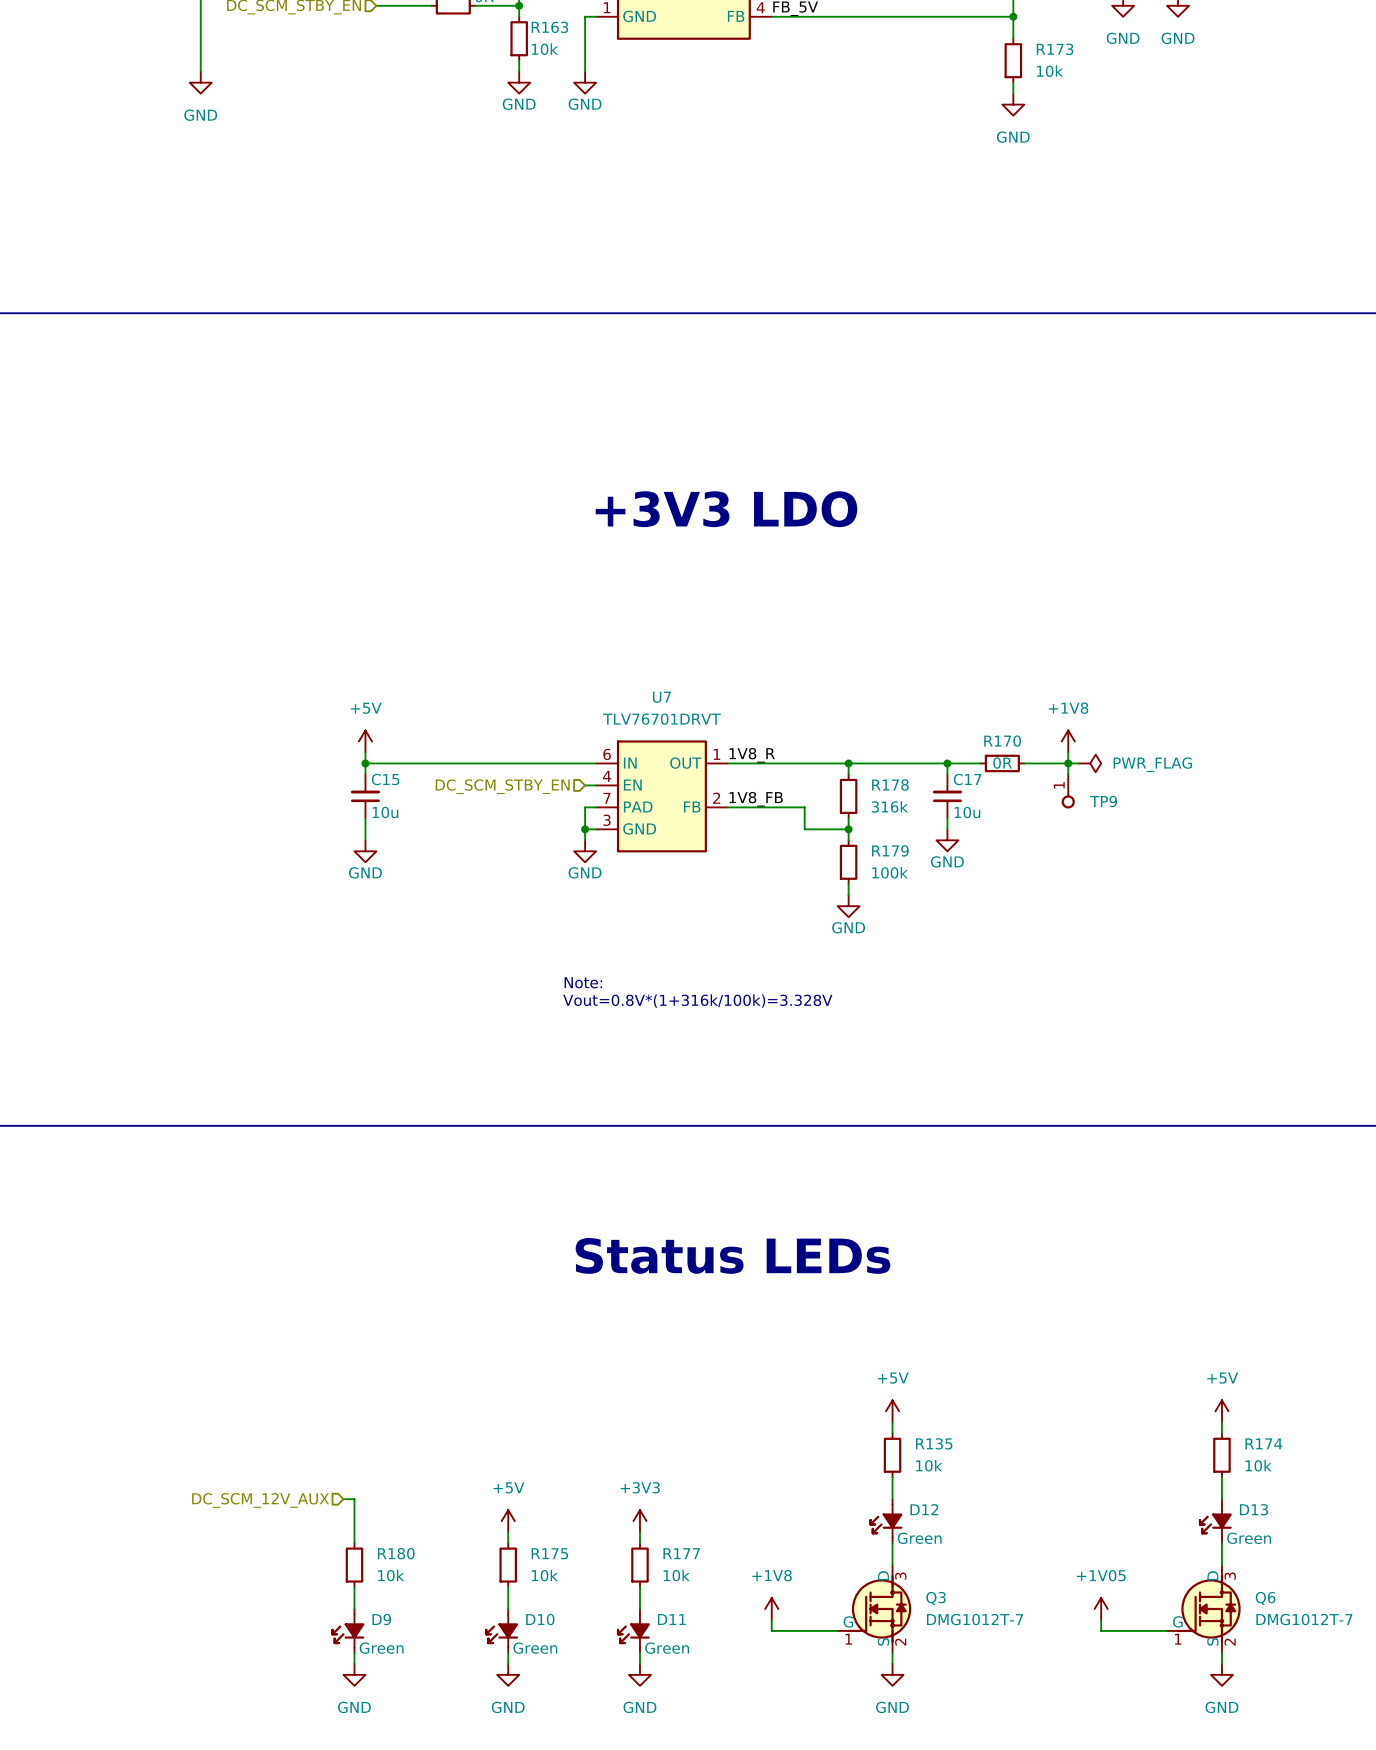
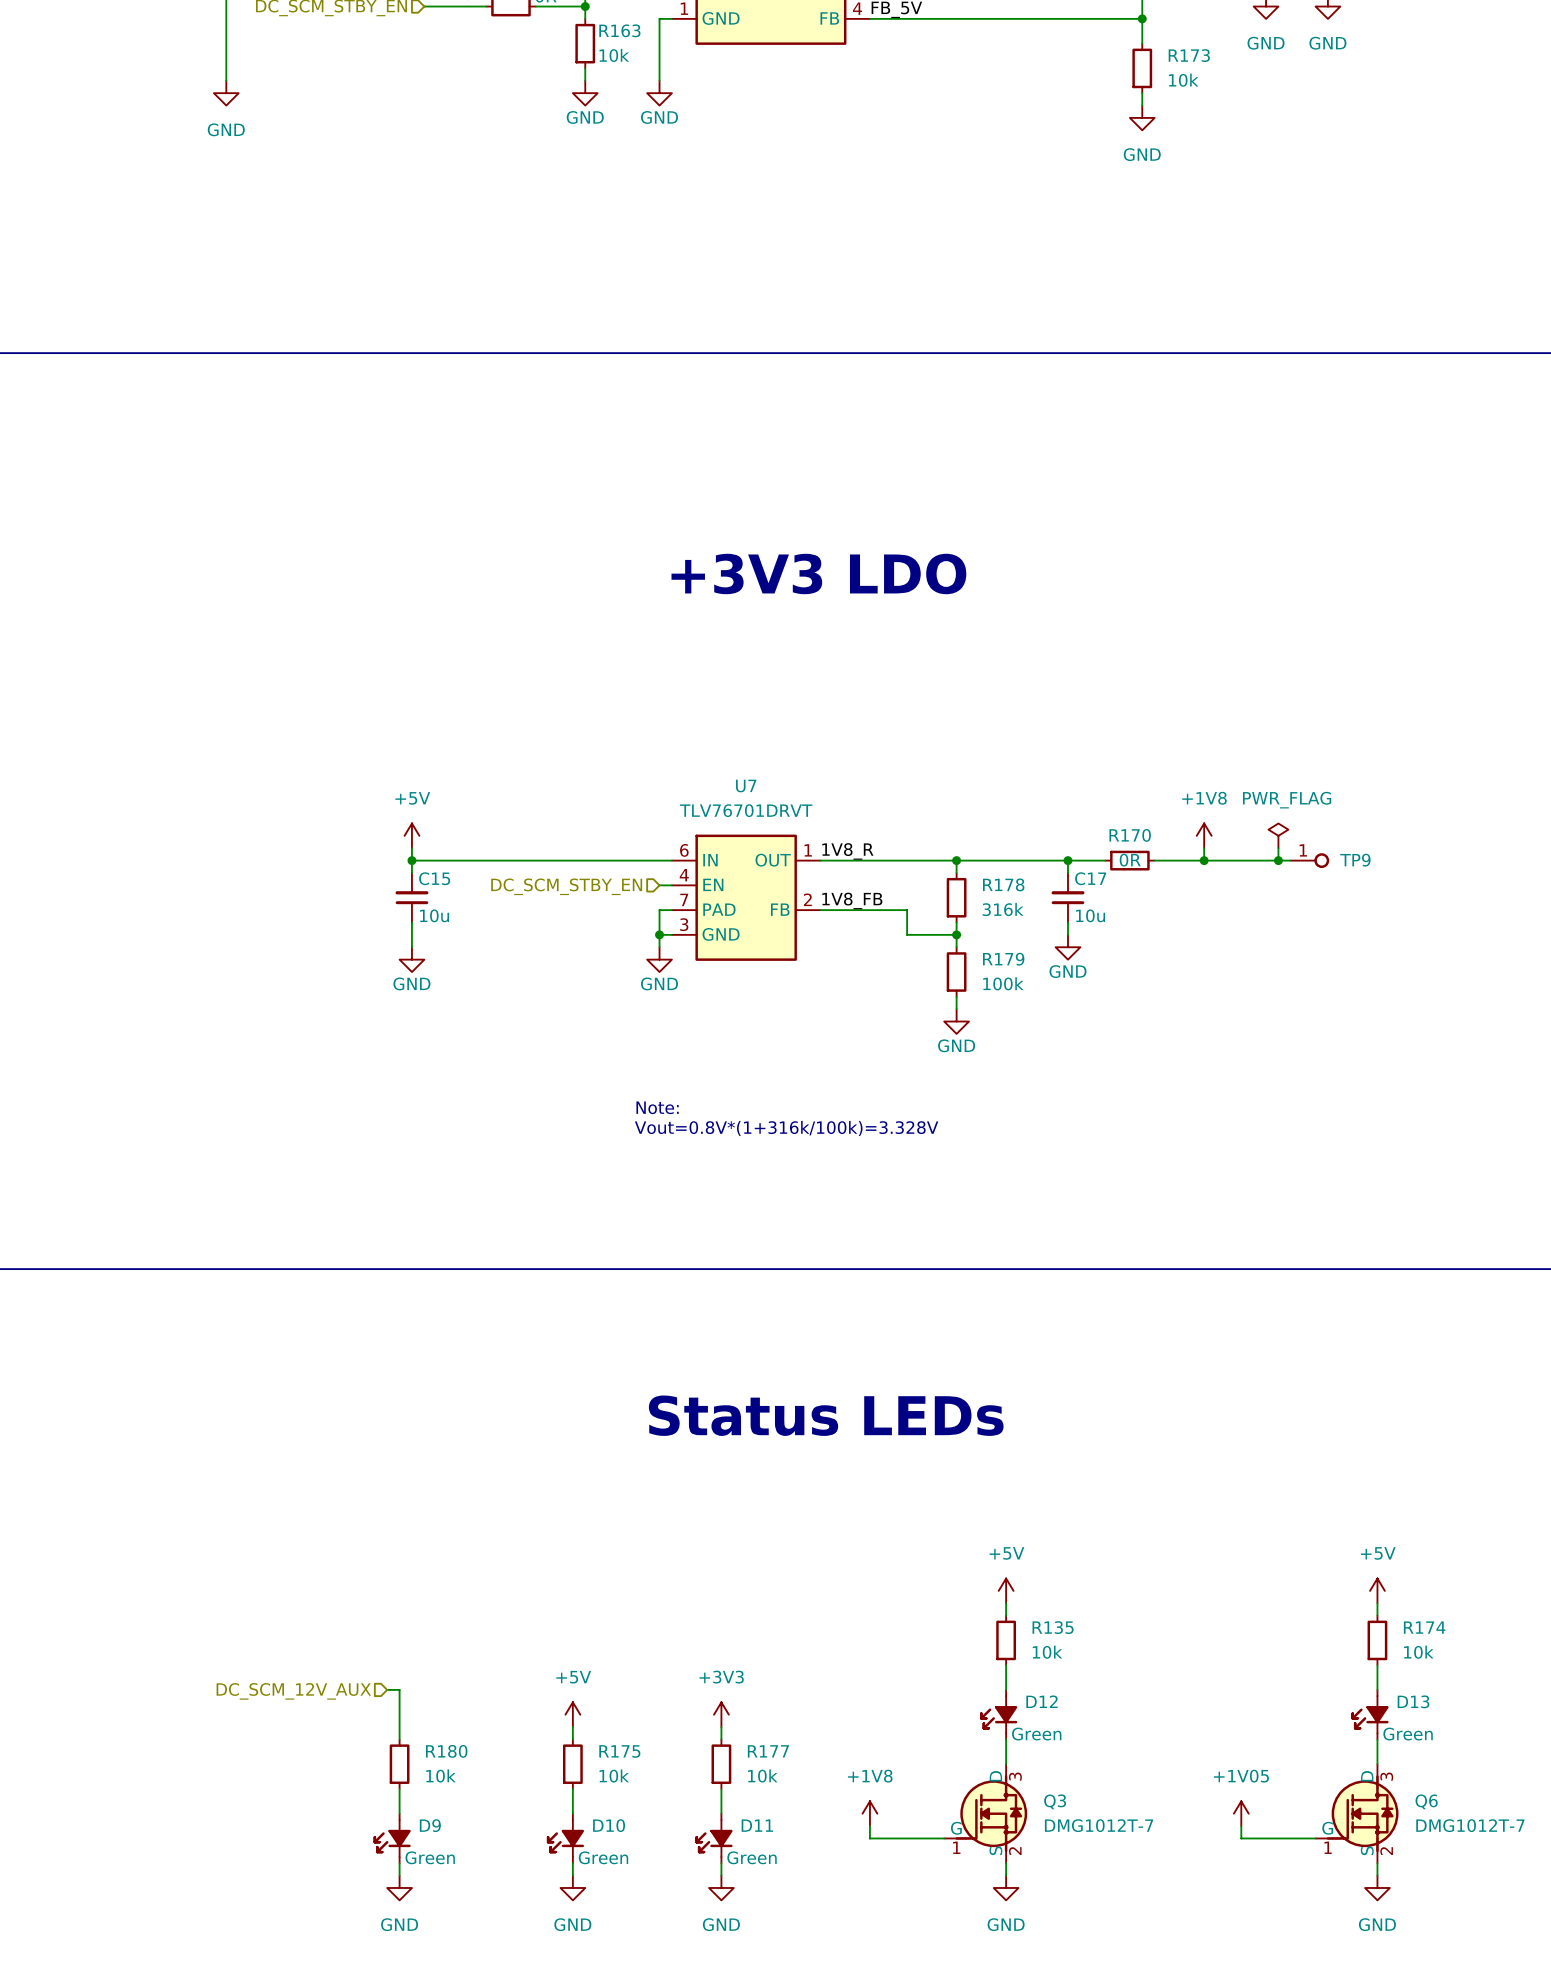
wire: (1068, 763) (1068, 774) -> (1278, 848) (1278, 860)
wire: none -> (1216, 860) (1290, 860)
power symbol rotation: 0° (1090, 763) -> 90° counterclockwise (1278, 835)
power symbol position: PWR_FLAG (1090, 763) -> PWR_FLAG (1278, 835)
junction: none -> (1278, 860)
power symbol text position: PWR_FLAG (1152, 764) -> PWR_FLAG (1287, 800)
TP9 position: (1068, 791) -> (1309, 860)
TP9 rotation: 0° (1068, 801) -> 90° counterclockwise (1321, 860)

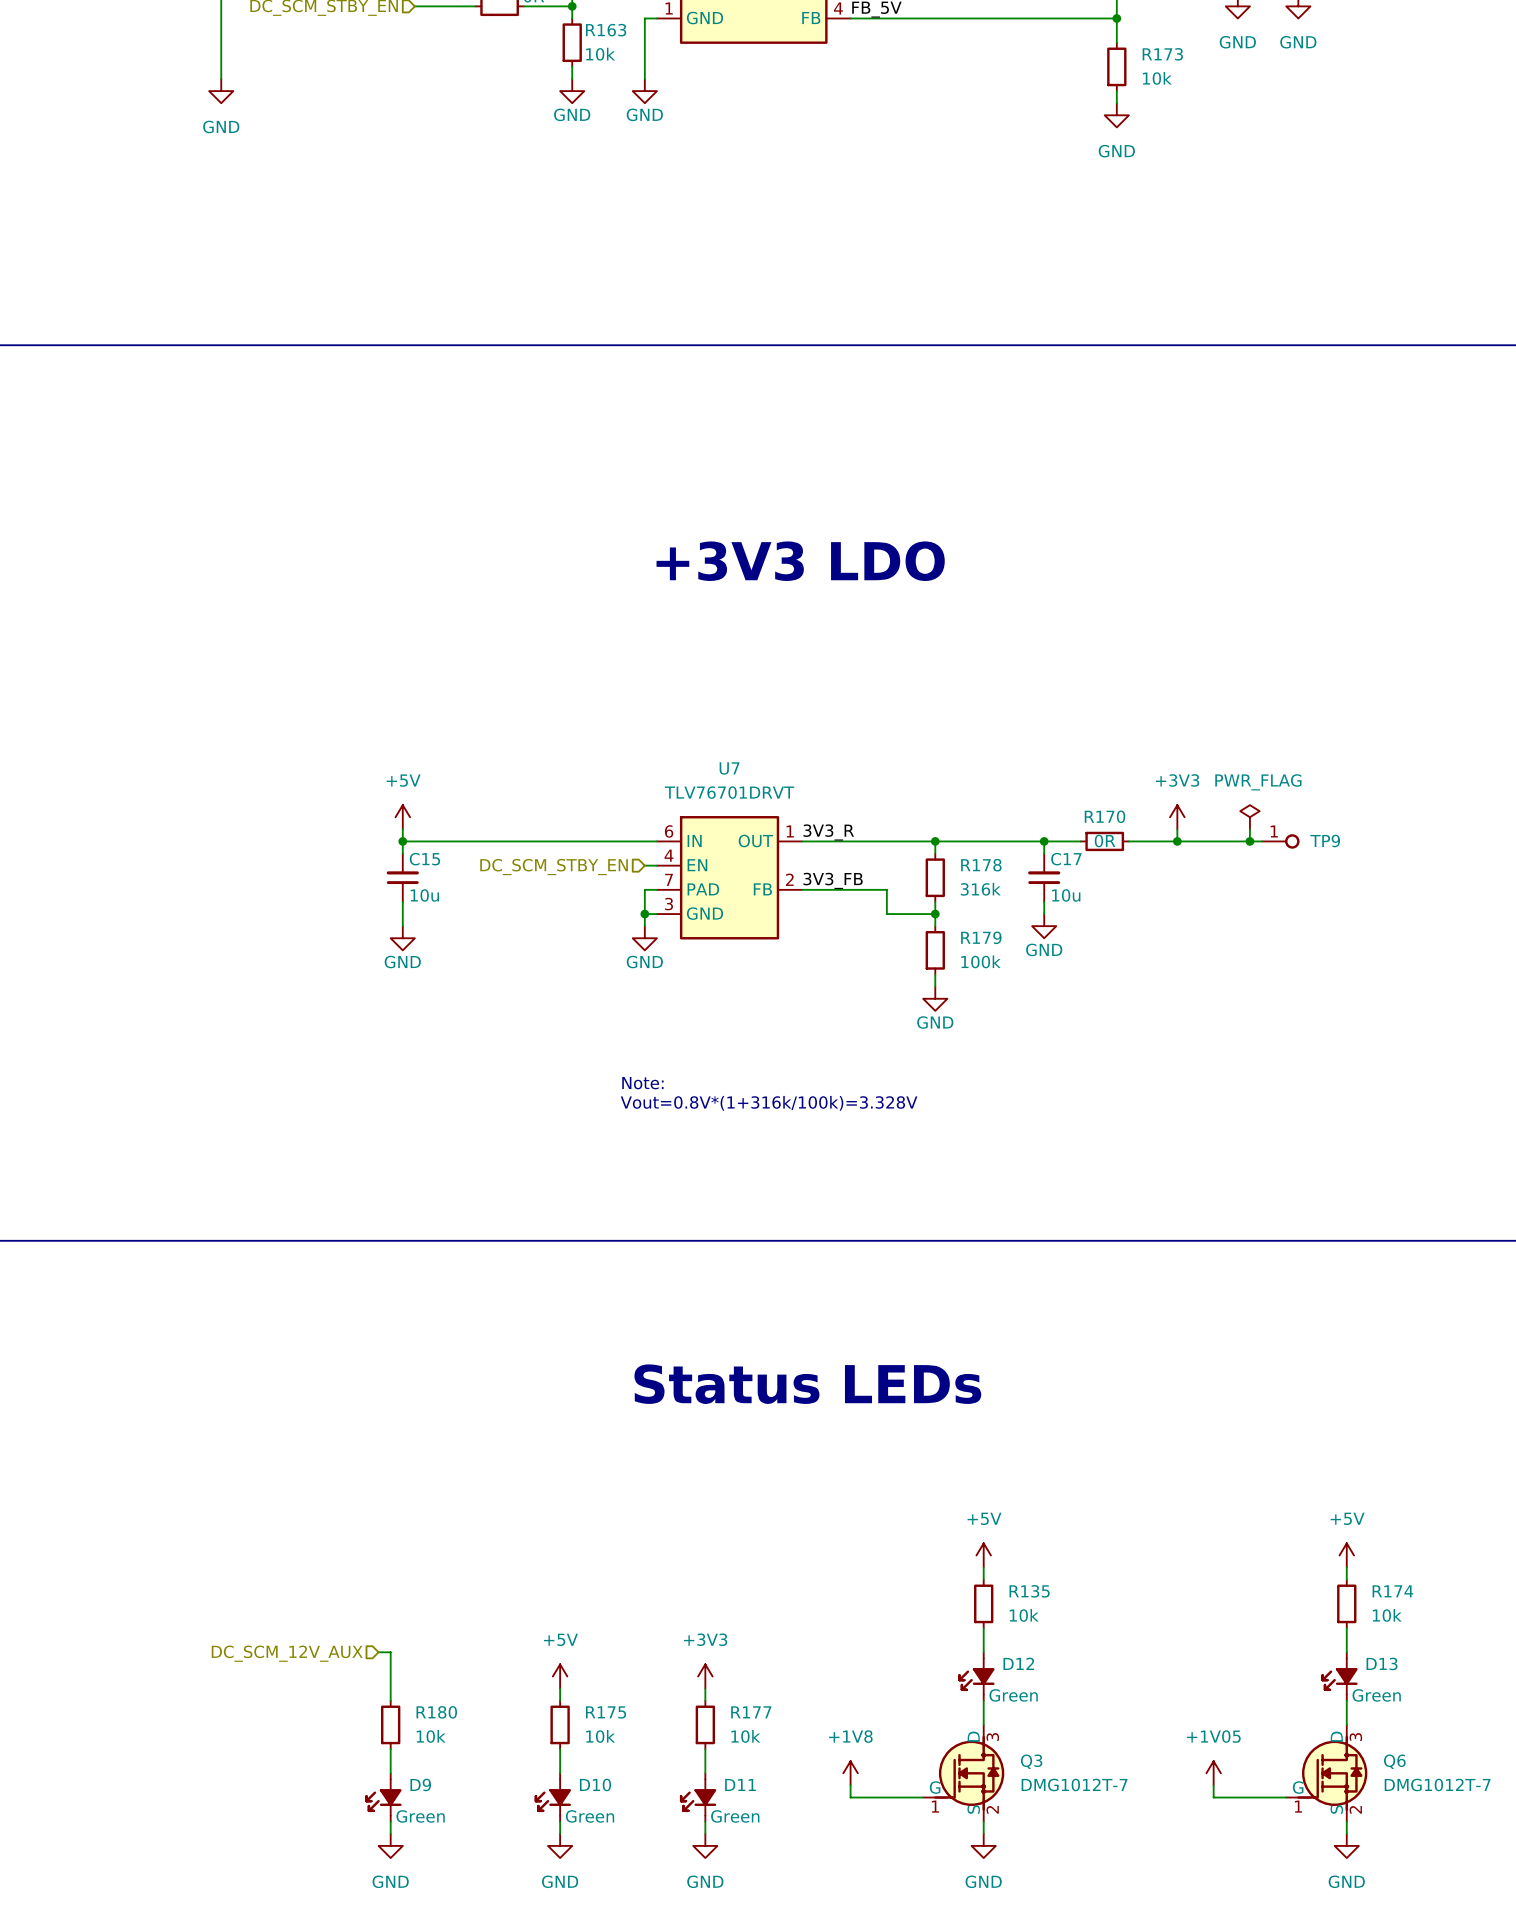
power symbol: +1V8 (1204, 835) -> +3V3 (1177, 817)
label: 1V8_R (847, 851) -> 3V3_R (828, 832)
label: 1V8_FB (852, 900) -> 3V3_FB (833, 880)

